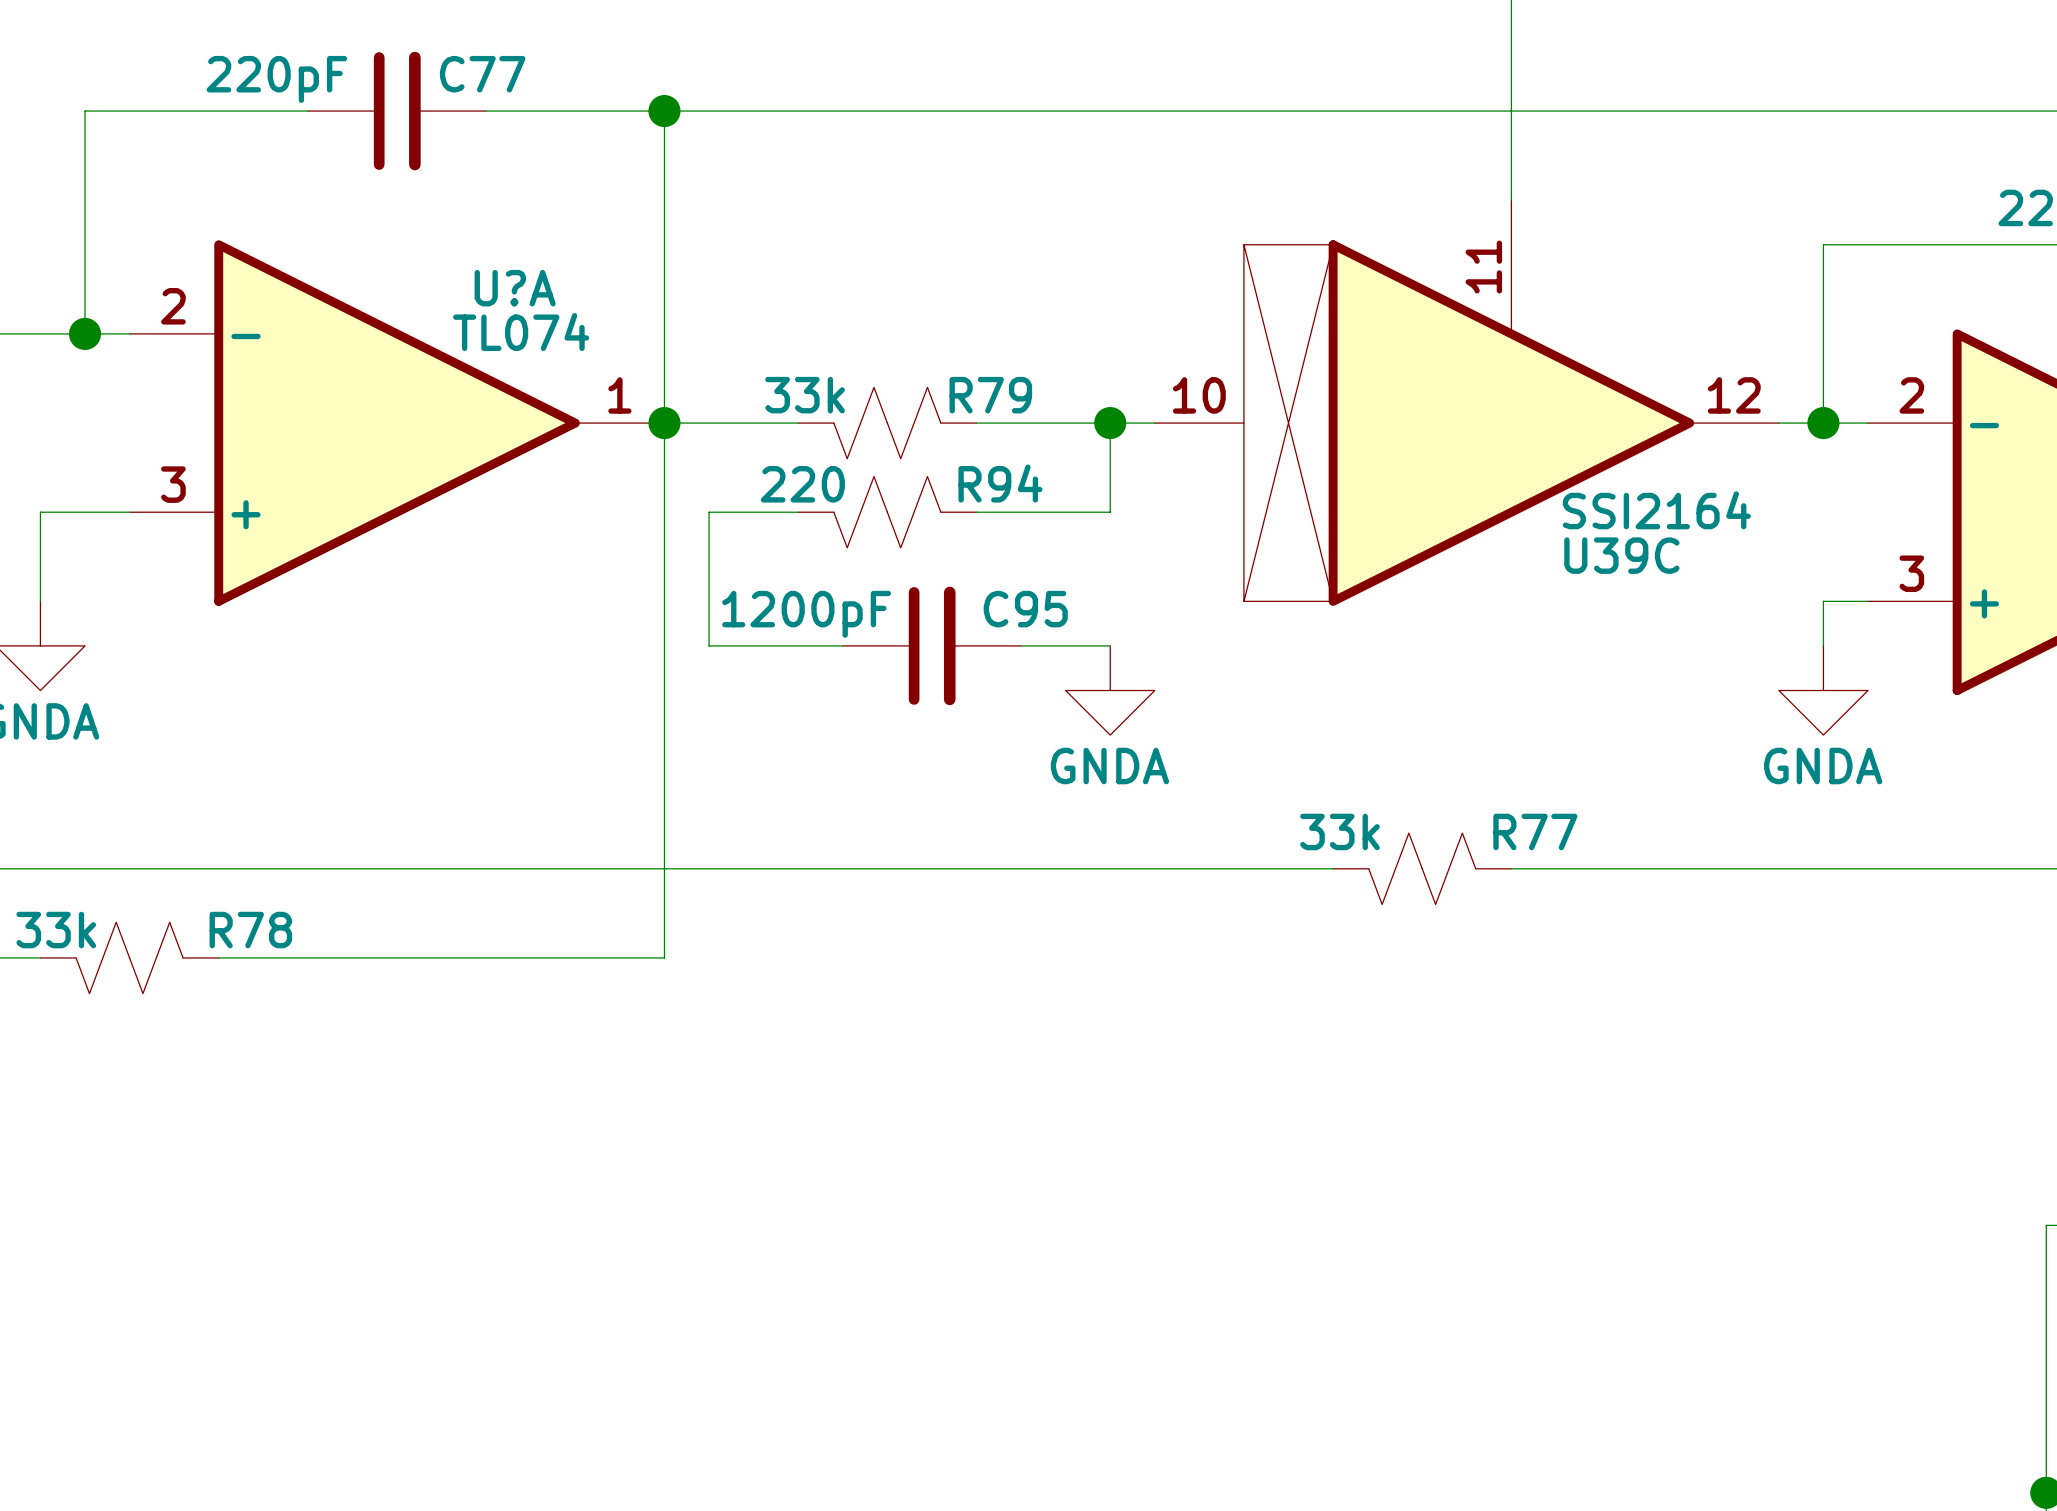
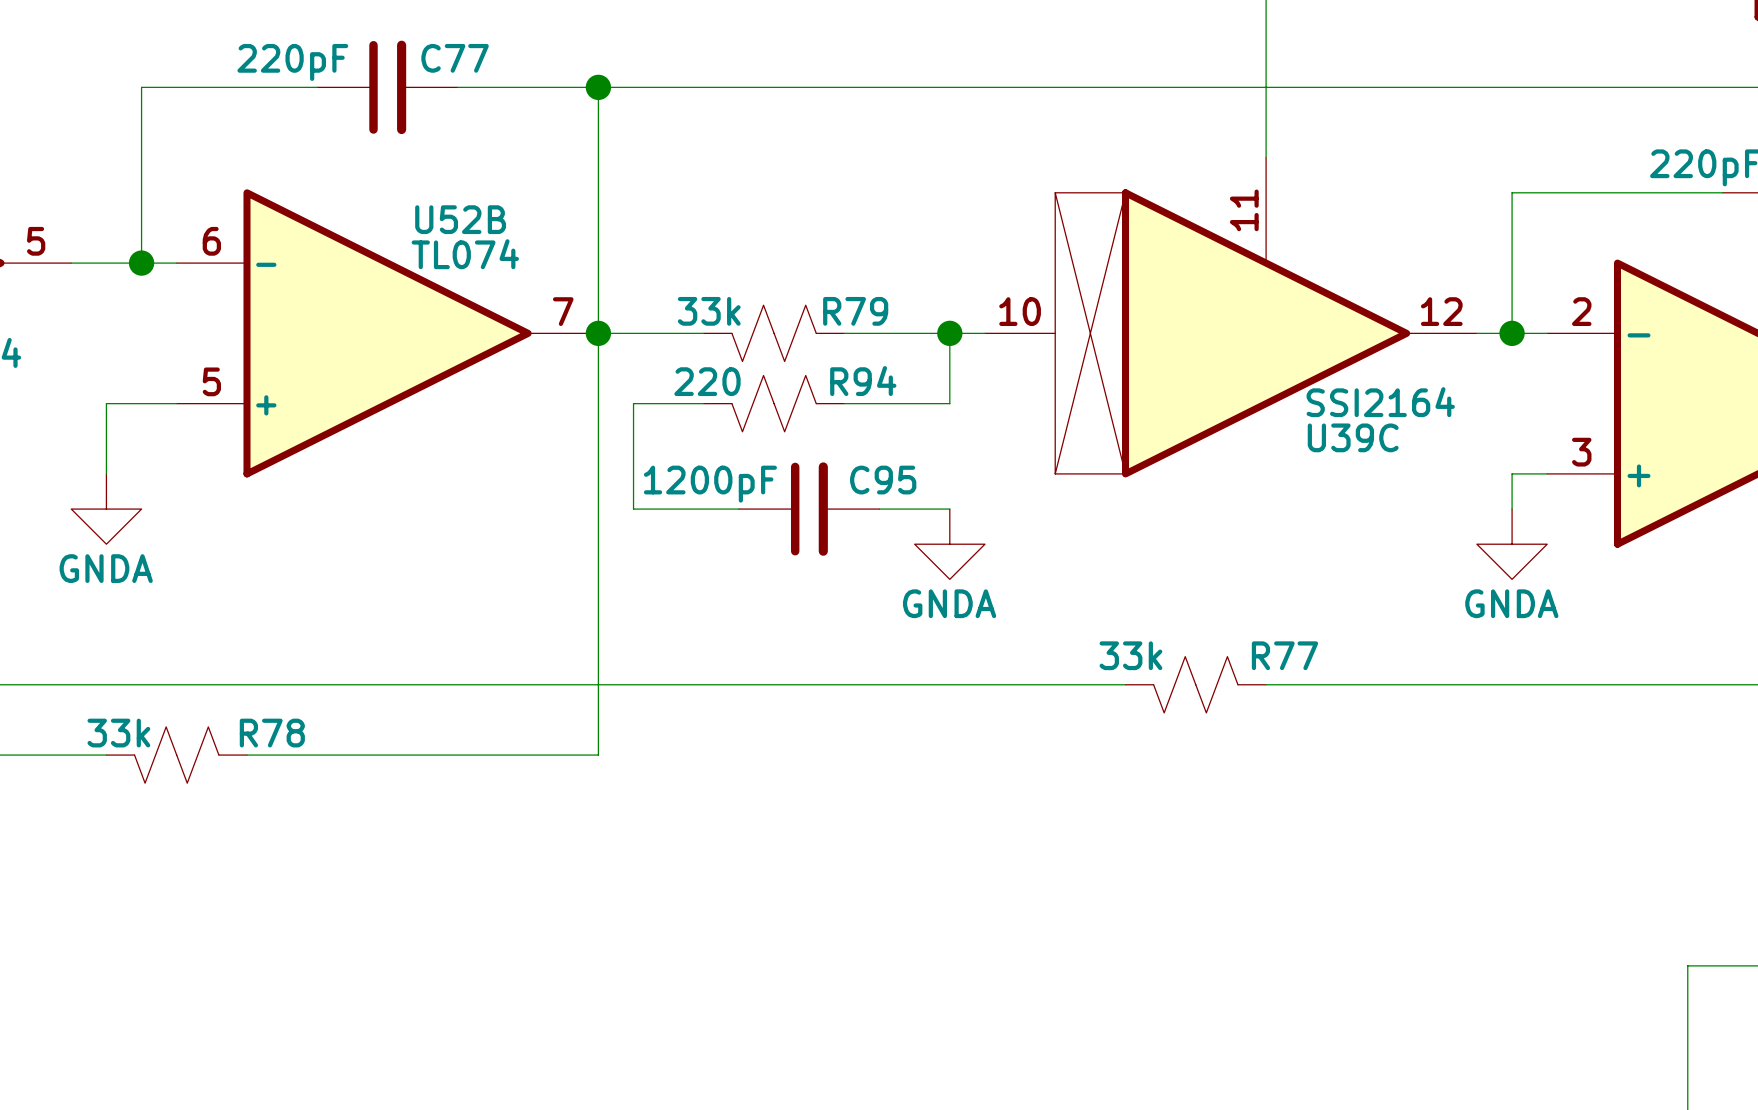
U?A symbol: [129, 240, 665, 606] -> [176, 189, 599, 478]
U?A name: U?A (515, 288) -> U52B (460, 219)

